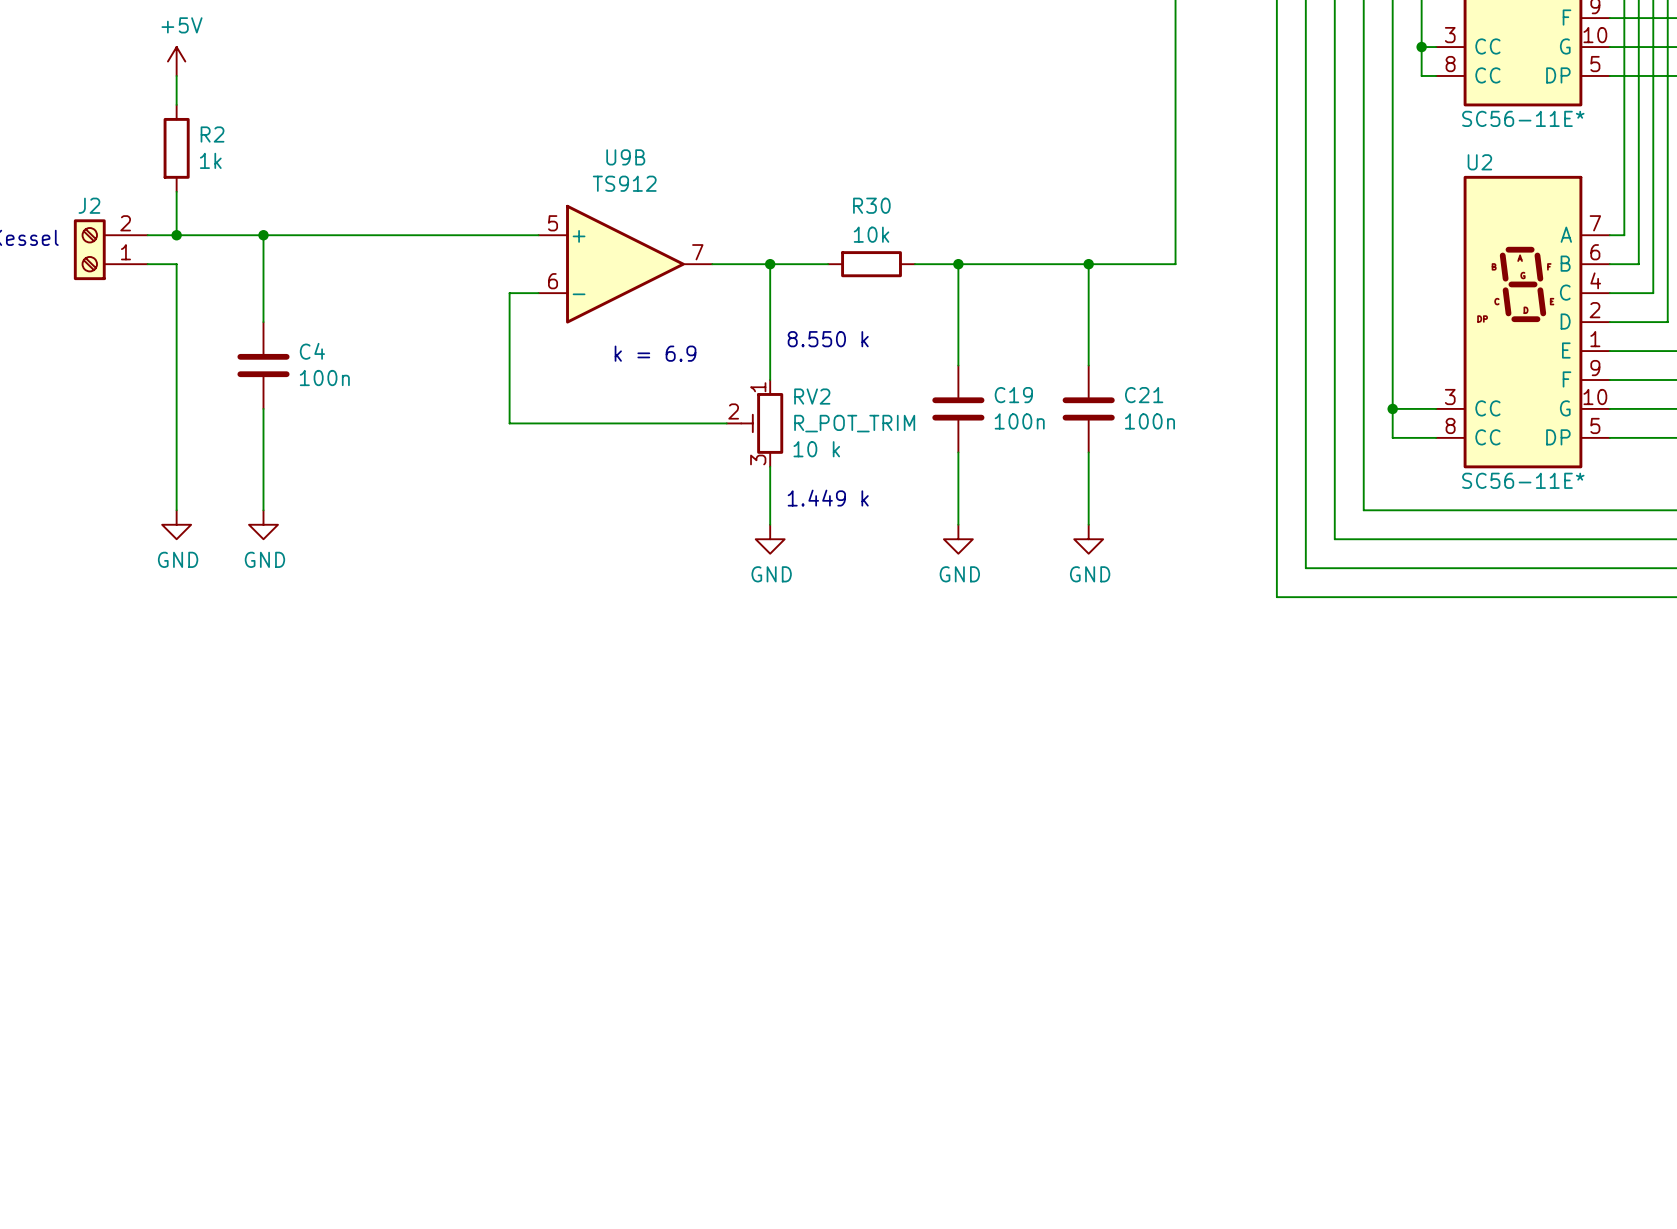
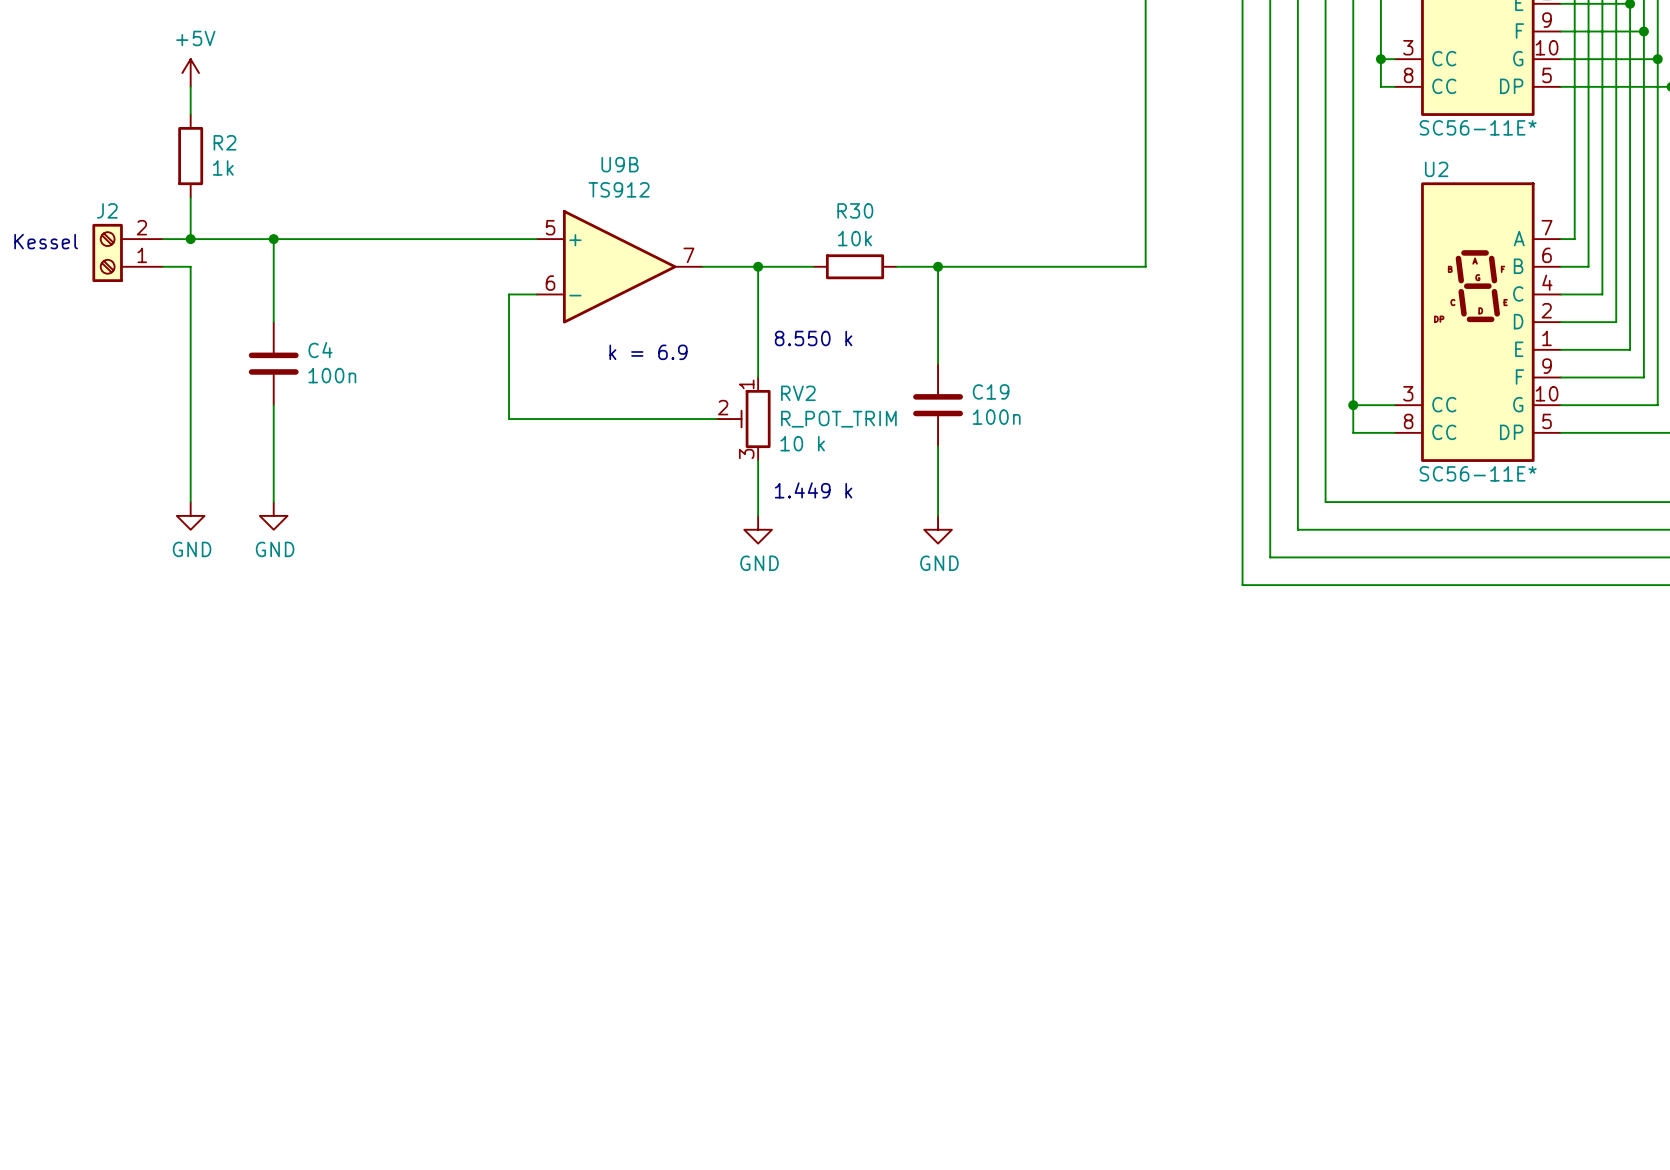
wire: (1088, 264) (1088, 365) -> none
junction: (1088, 264) -> none
C21: 100n (1088, 408) -> none
wire: (1088, 452) (1088, 524) -> none
power symbol: GND (1088, 539) -> none

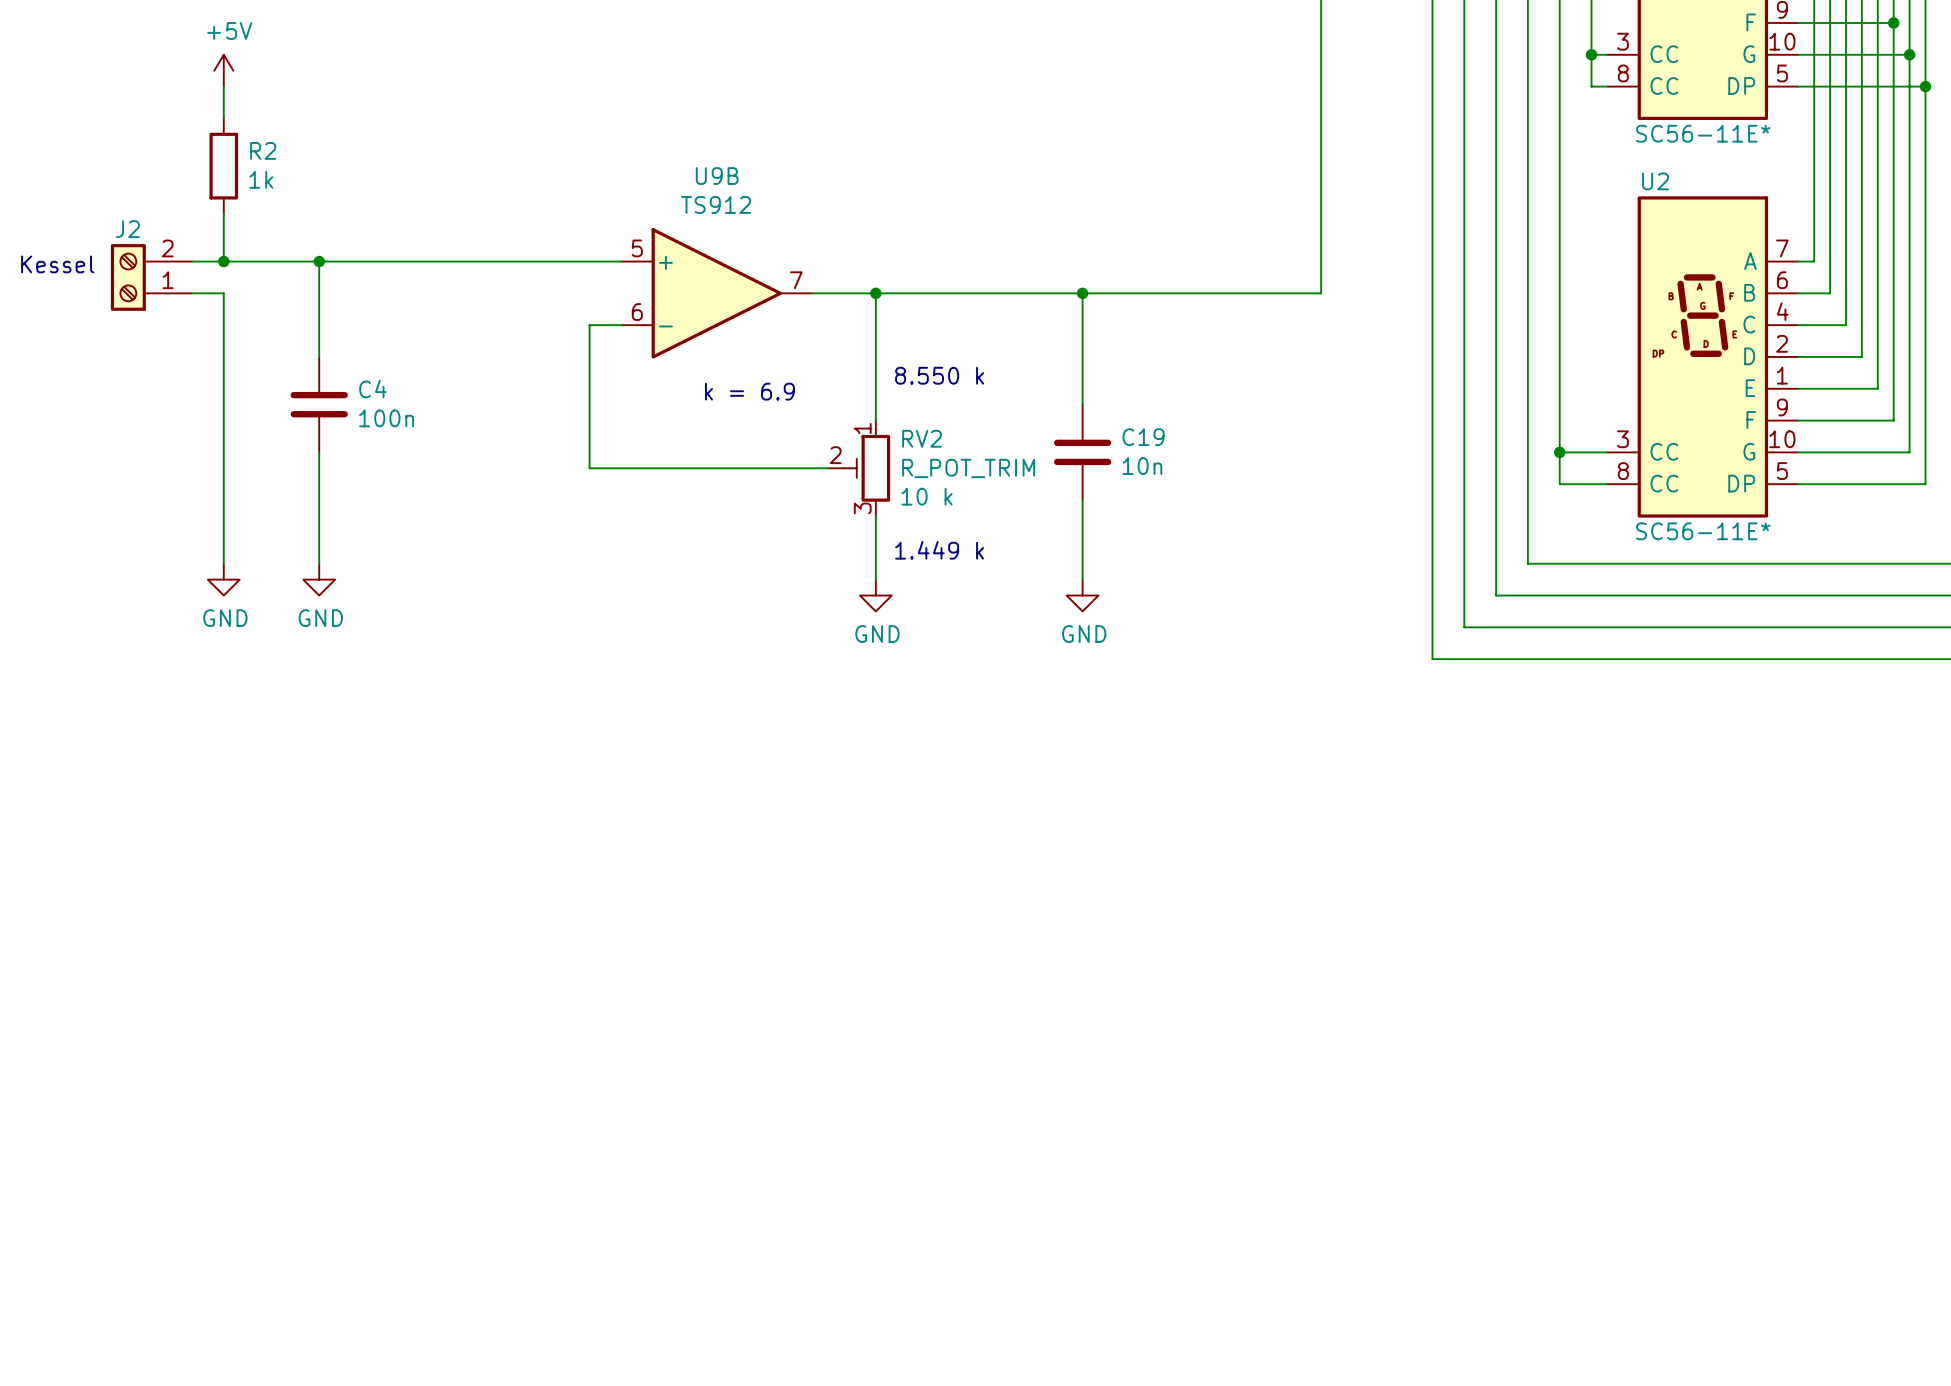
wire: none -> (939, 293) (1034, 293)
R30: 10k (855, 266) -> none
C19 value: 100n (996, 417) -> 10n (1142, 466)

